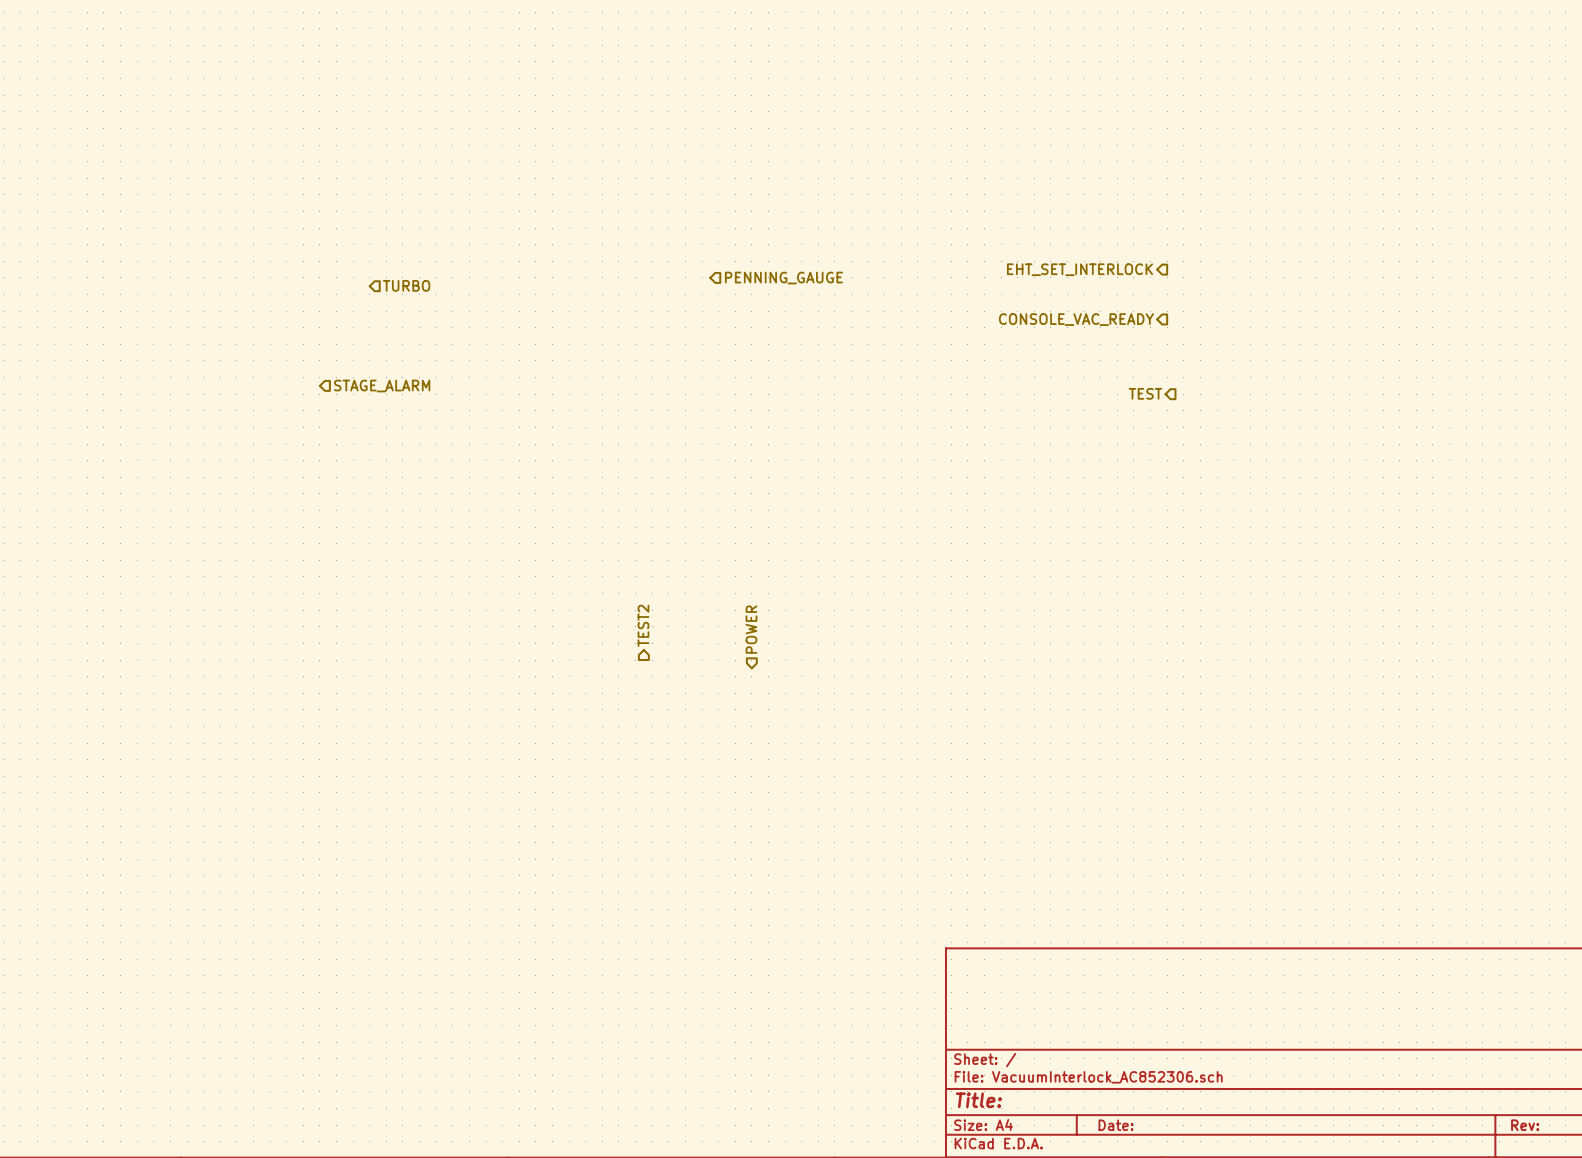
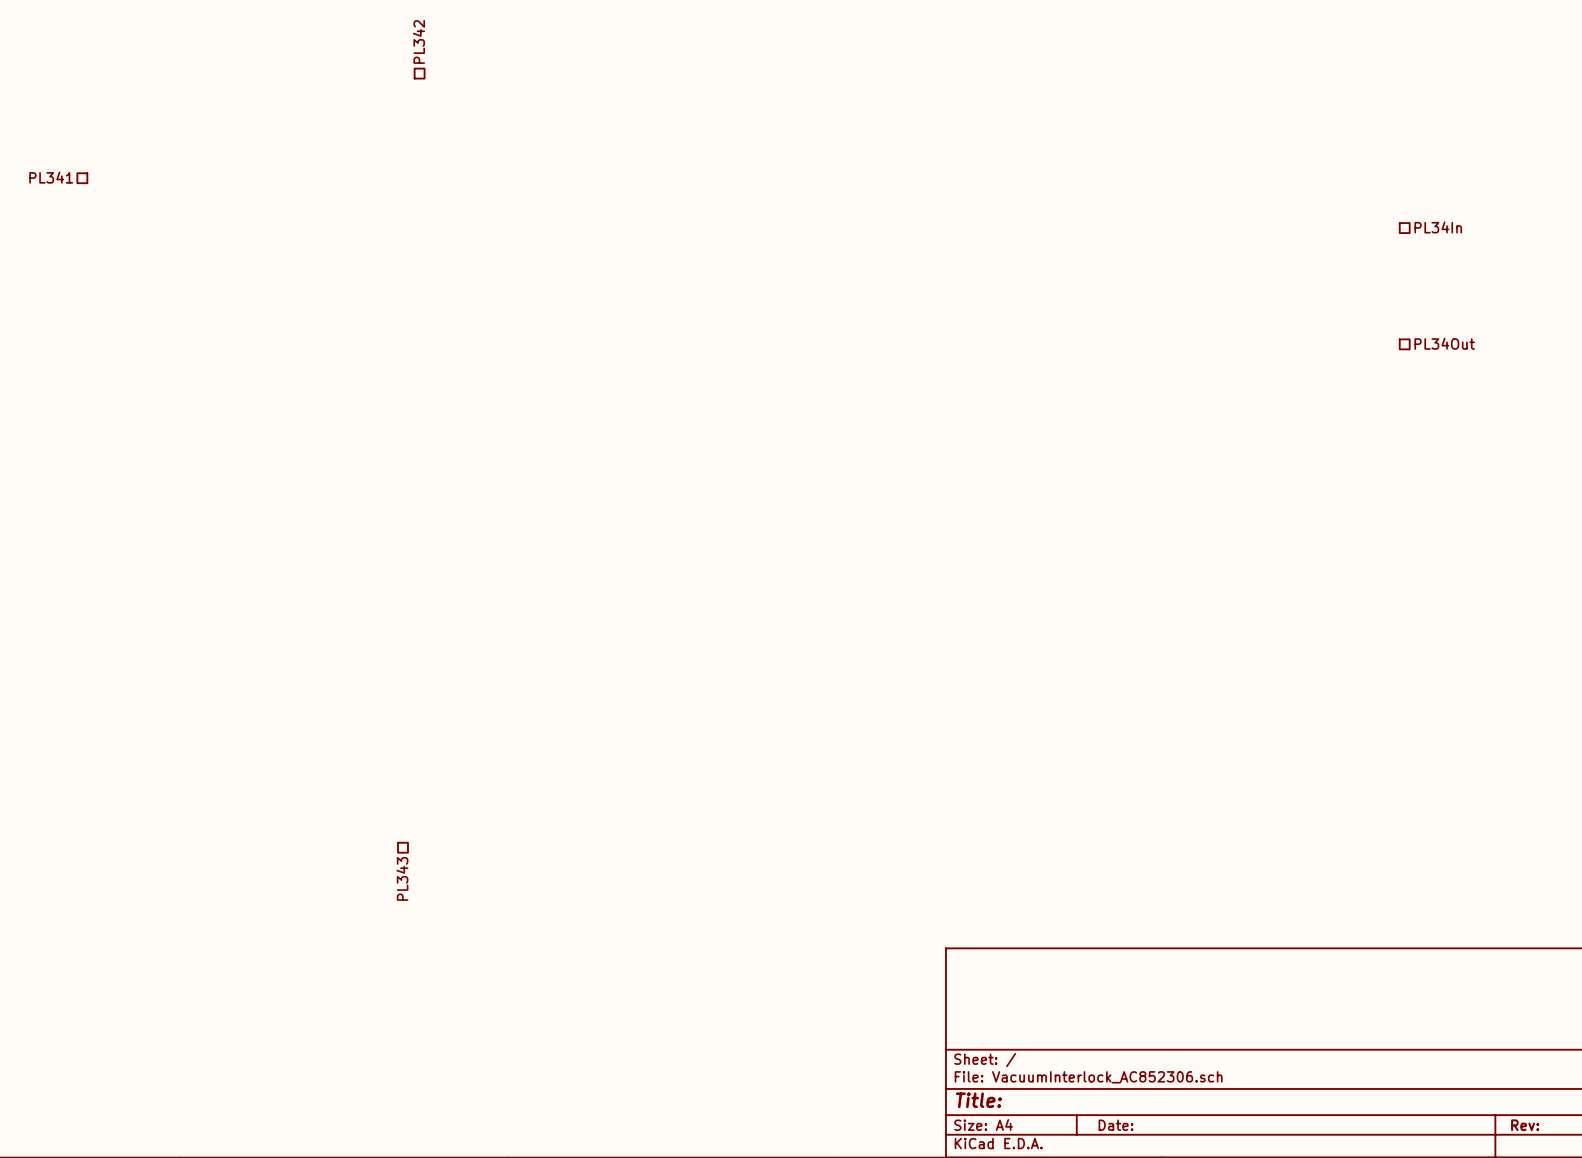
hierarchical label: none -> PL342 (418, 41)
hierarchical label: none -> PL341 (51, 177)
hierarchical label: none -> PL34In (1438, 227)
hierarchical label: EHT_SET_INTERLOCK (1080, 269) -> none
hierarchical label: PENNING_GAUGE (783, 278) -> none
hierarchical label: TURBO (406, 285) -> none
hierarchical label: CONSOLE_VAC_READY (1076, 319) -> none
hierarchical label: none -> PL34Out (1444, 343)
hierarchical label: STAGE_ALARM (382, 386) -> none
hierarchical label: TEST (1145, 393) -> none
hierarchical label: TEST2 (643, 625) -> none
hierarchical label: POWER (751, 629) -> none
hierarchical label: none -> PL343 (402, 878)

